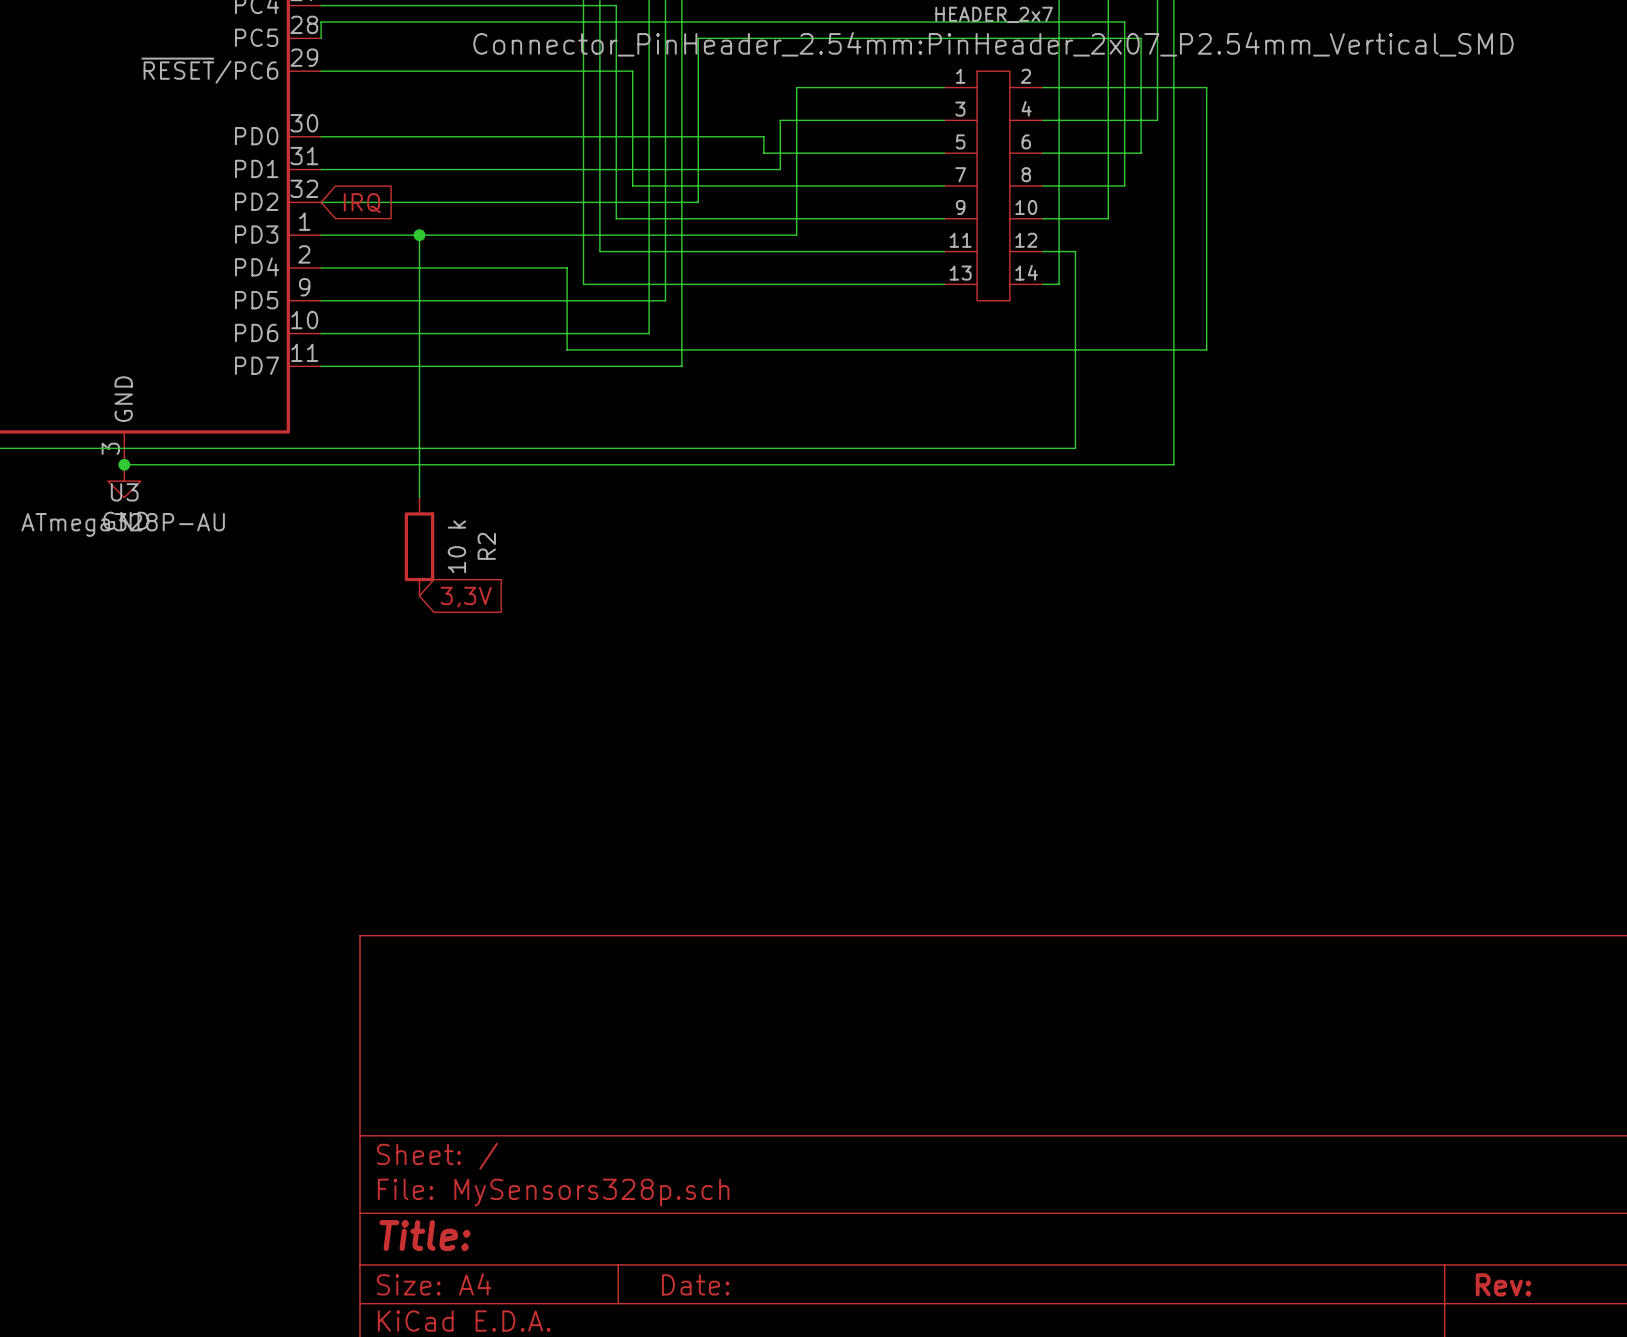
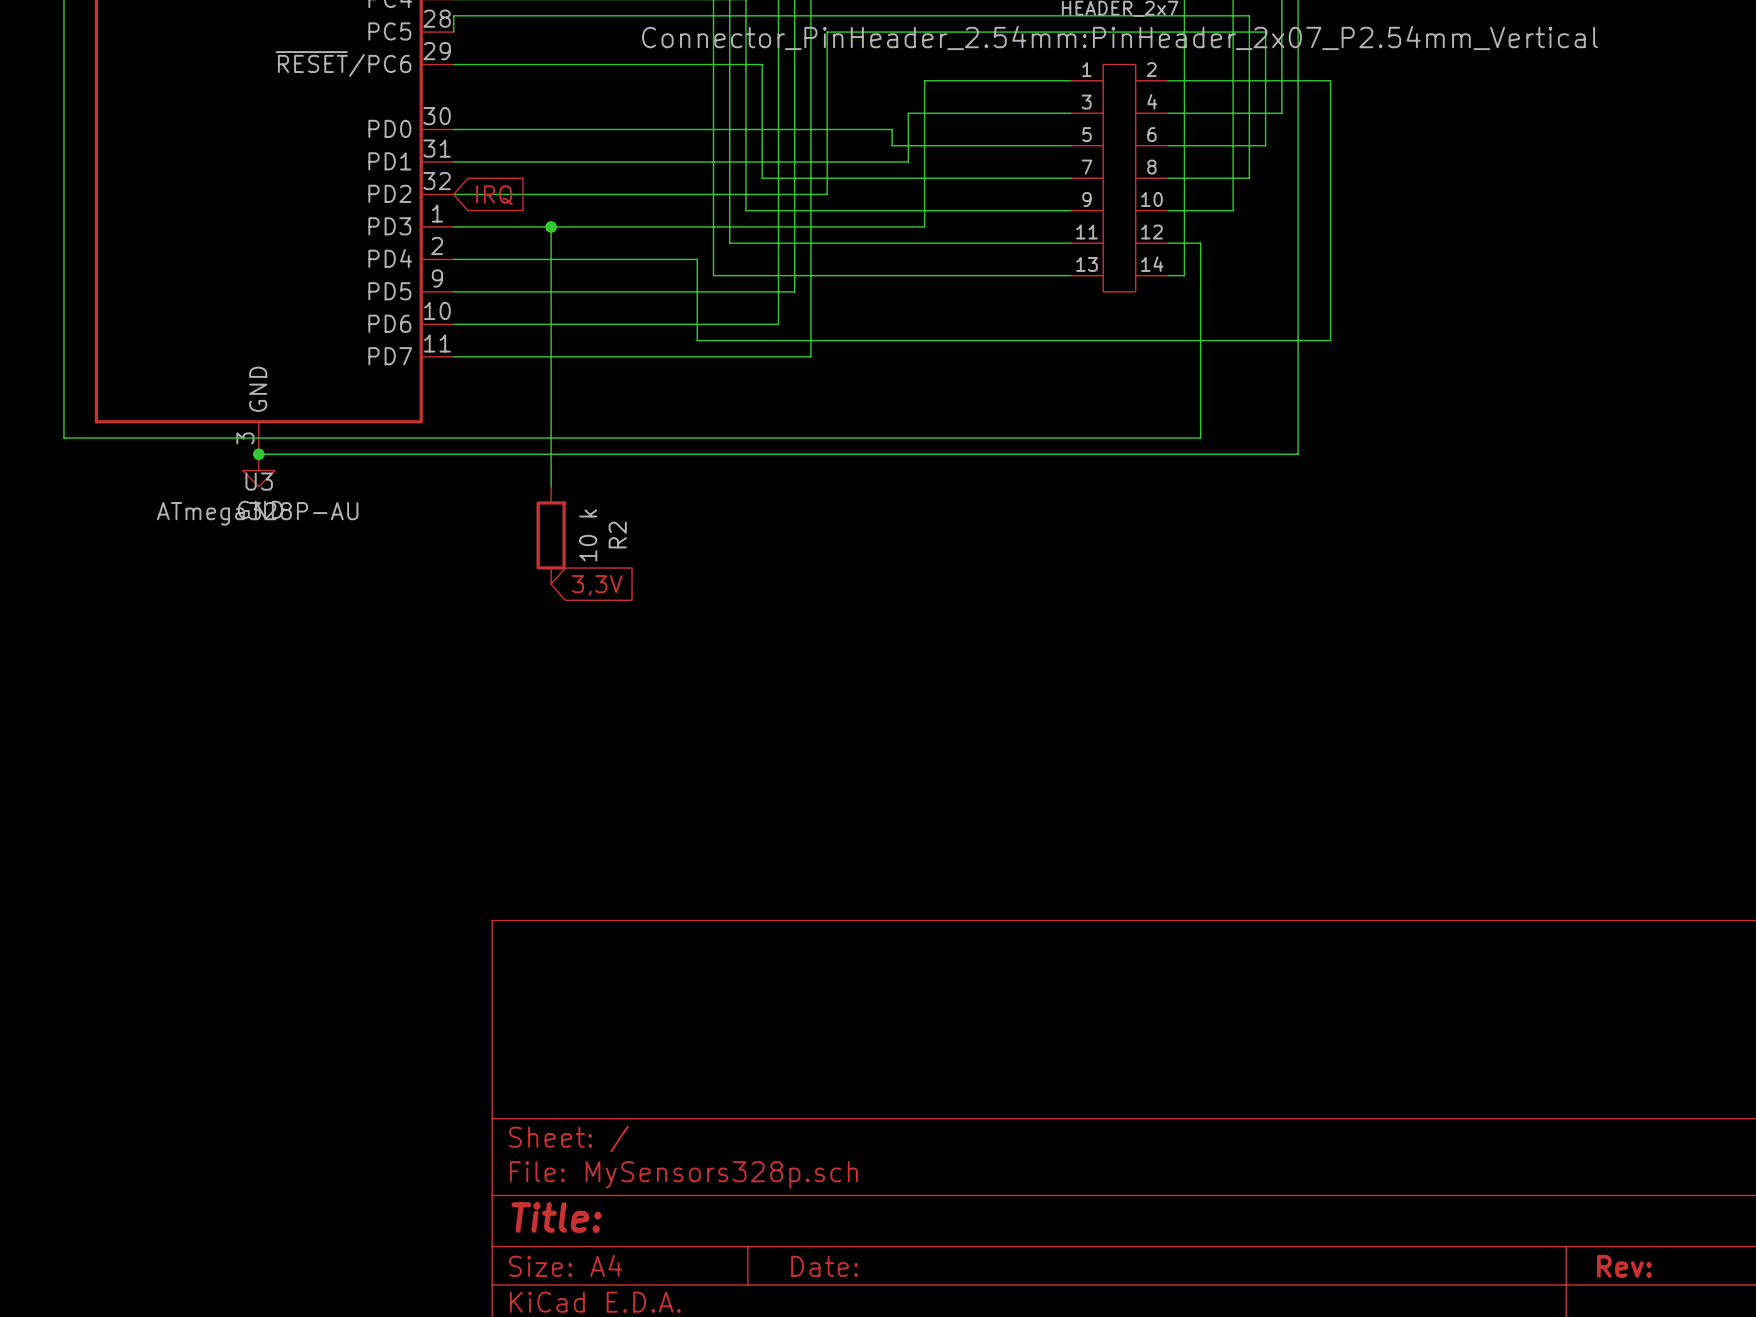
part text: Connector_PinHeader_2.54mm:PinHeader_2x07_P2.54mm_Vertical_SMD (993, 44) -> Connector_PinHeader_2.54mm:PinHeader_2x07_P2.54mm_Vertical (1119, 37)

